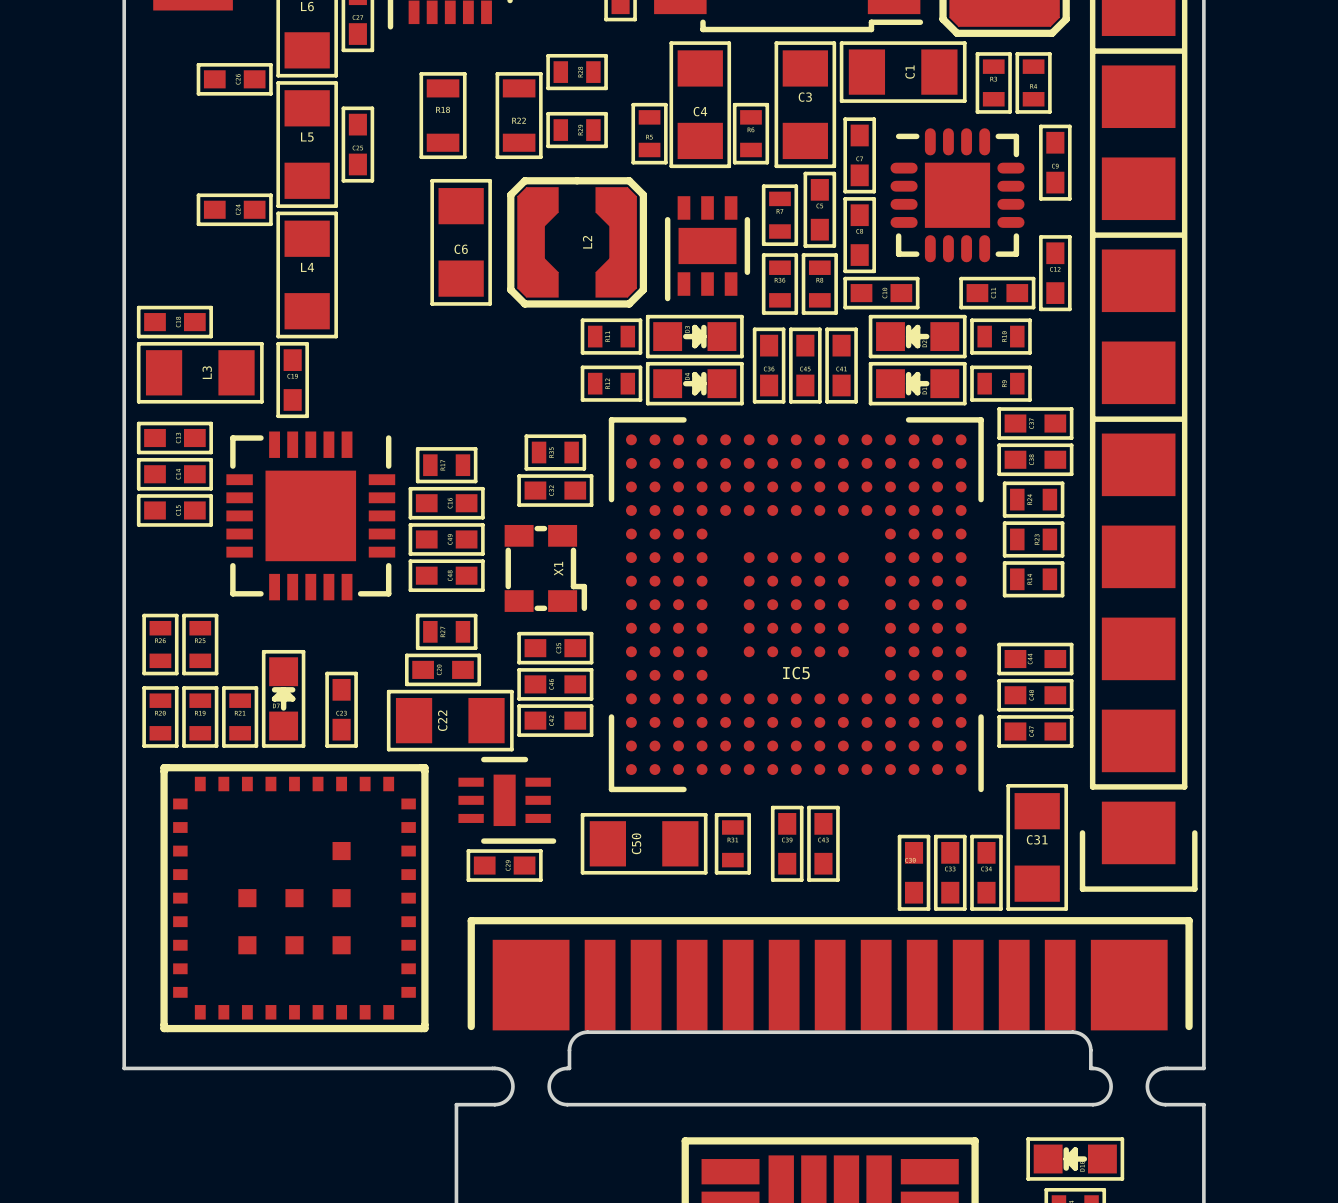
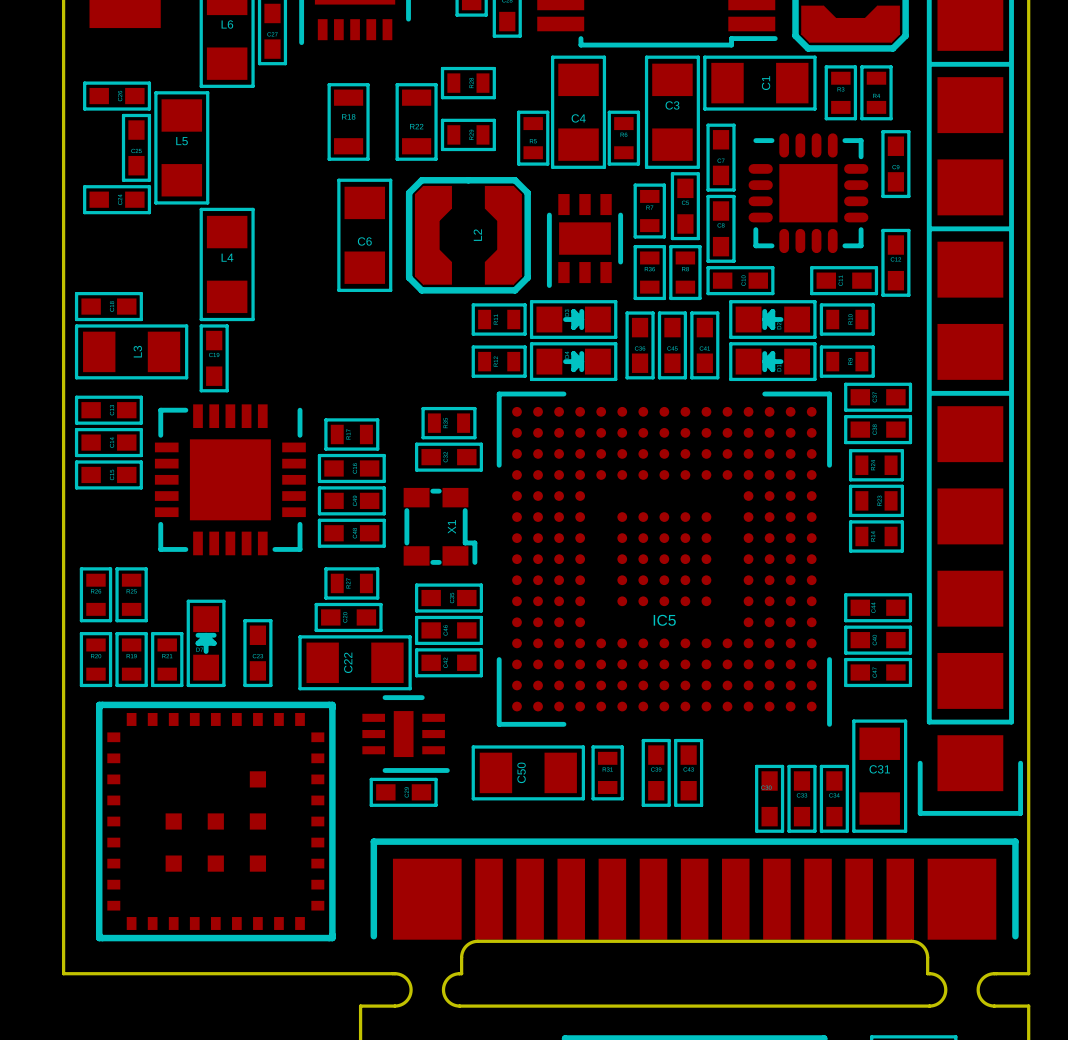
part position: (234, 79) -> (117, 96)
L5 position: (307, 144) -> (181, 147)
part position: (357, 144) -> (136, 147)
part position: (234, 209) -> (117, 199)

